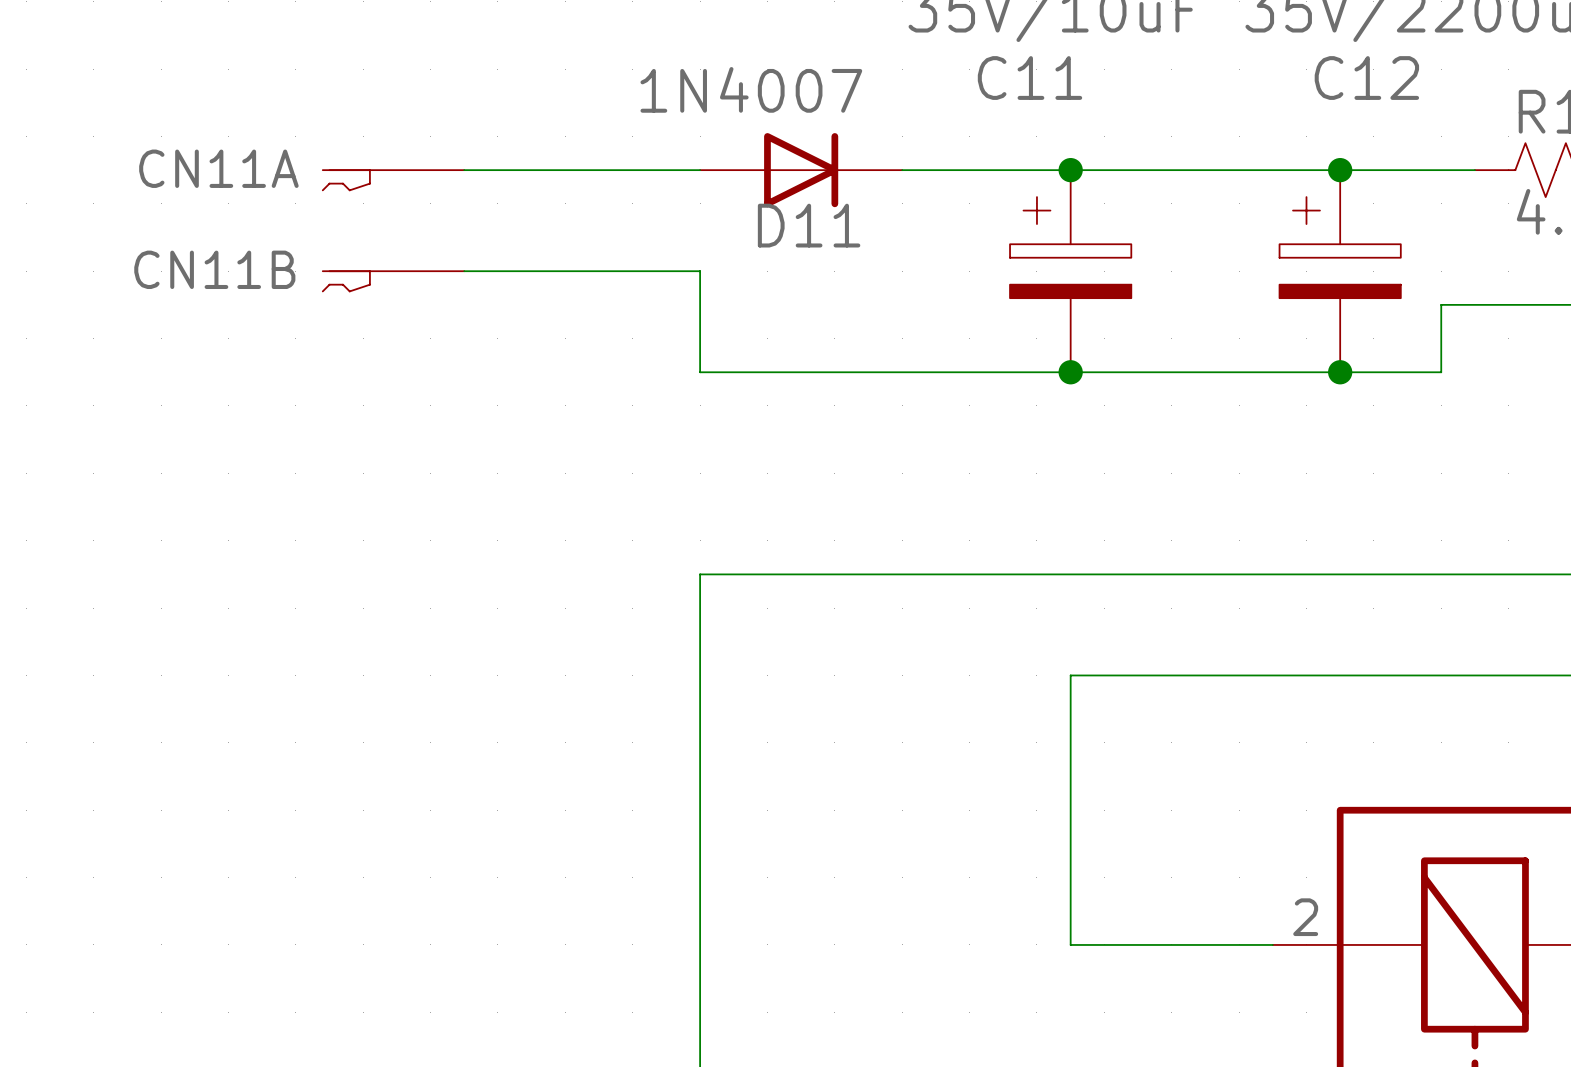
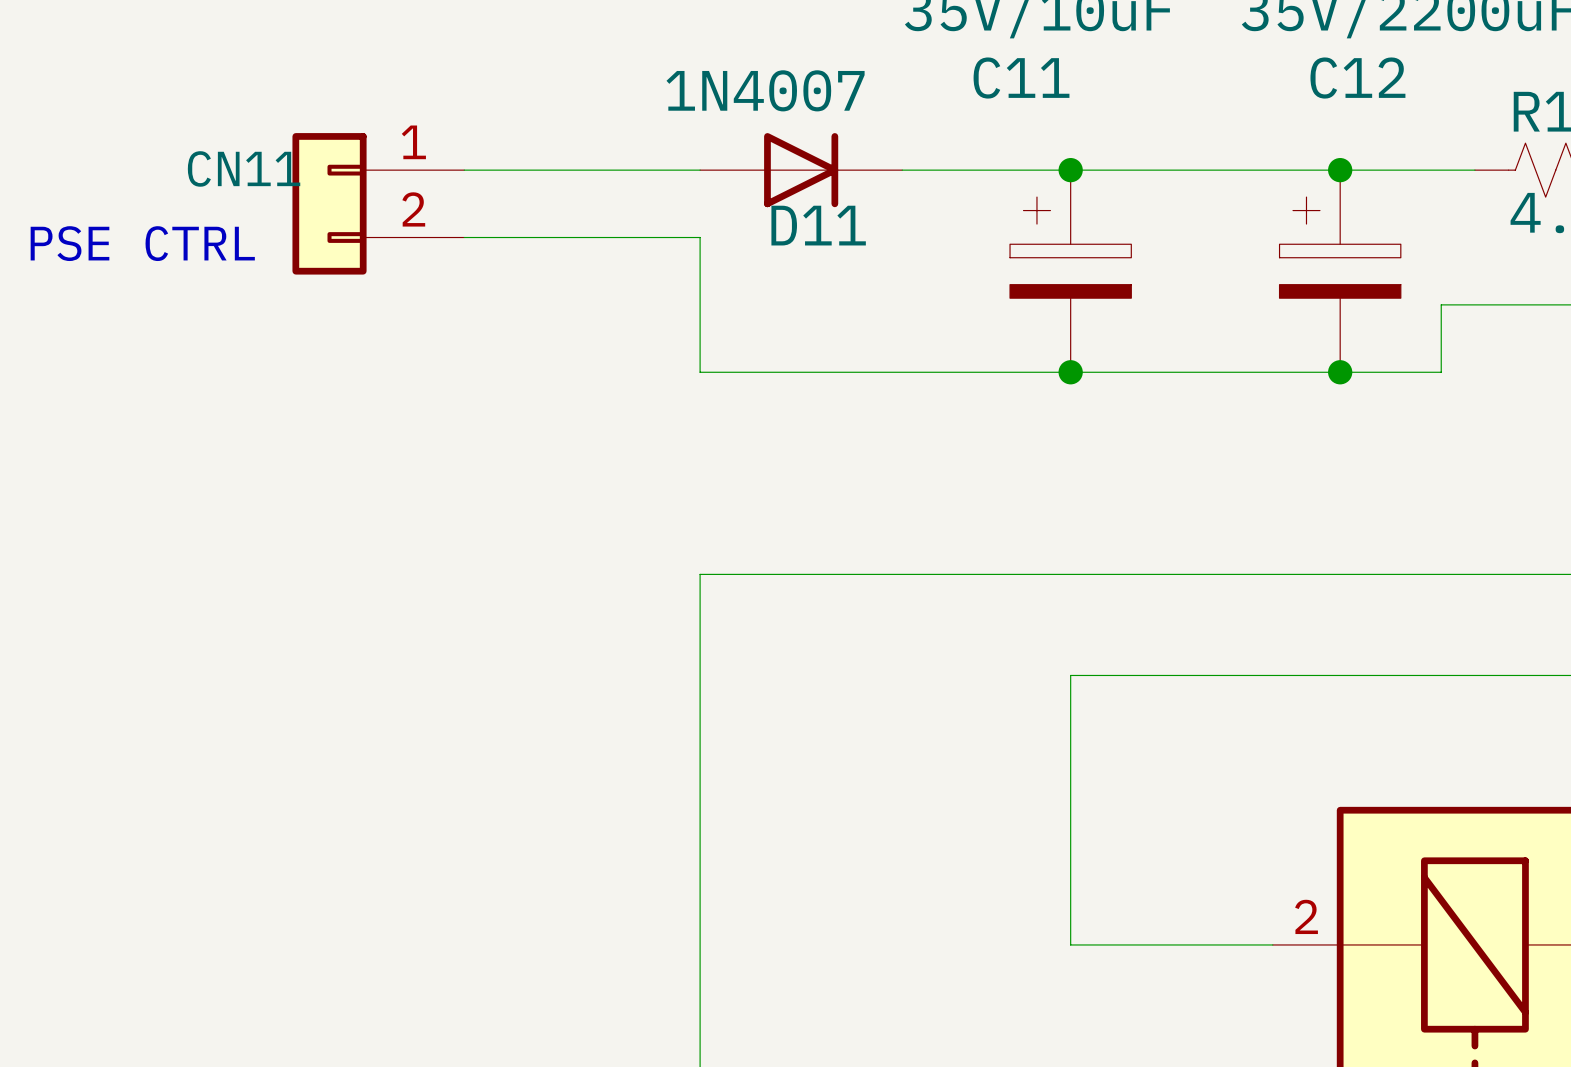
CN11A: (393, 180) -> none
CN11: none -> (378, 203)
text: none -> PSE CTRL (142, 243)
wire: (464, 271) (700, 271) -> (464, 237) (700, 237) (700, 271)
CN11B: (393, 281) -> none

